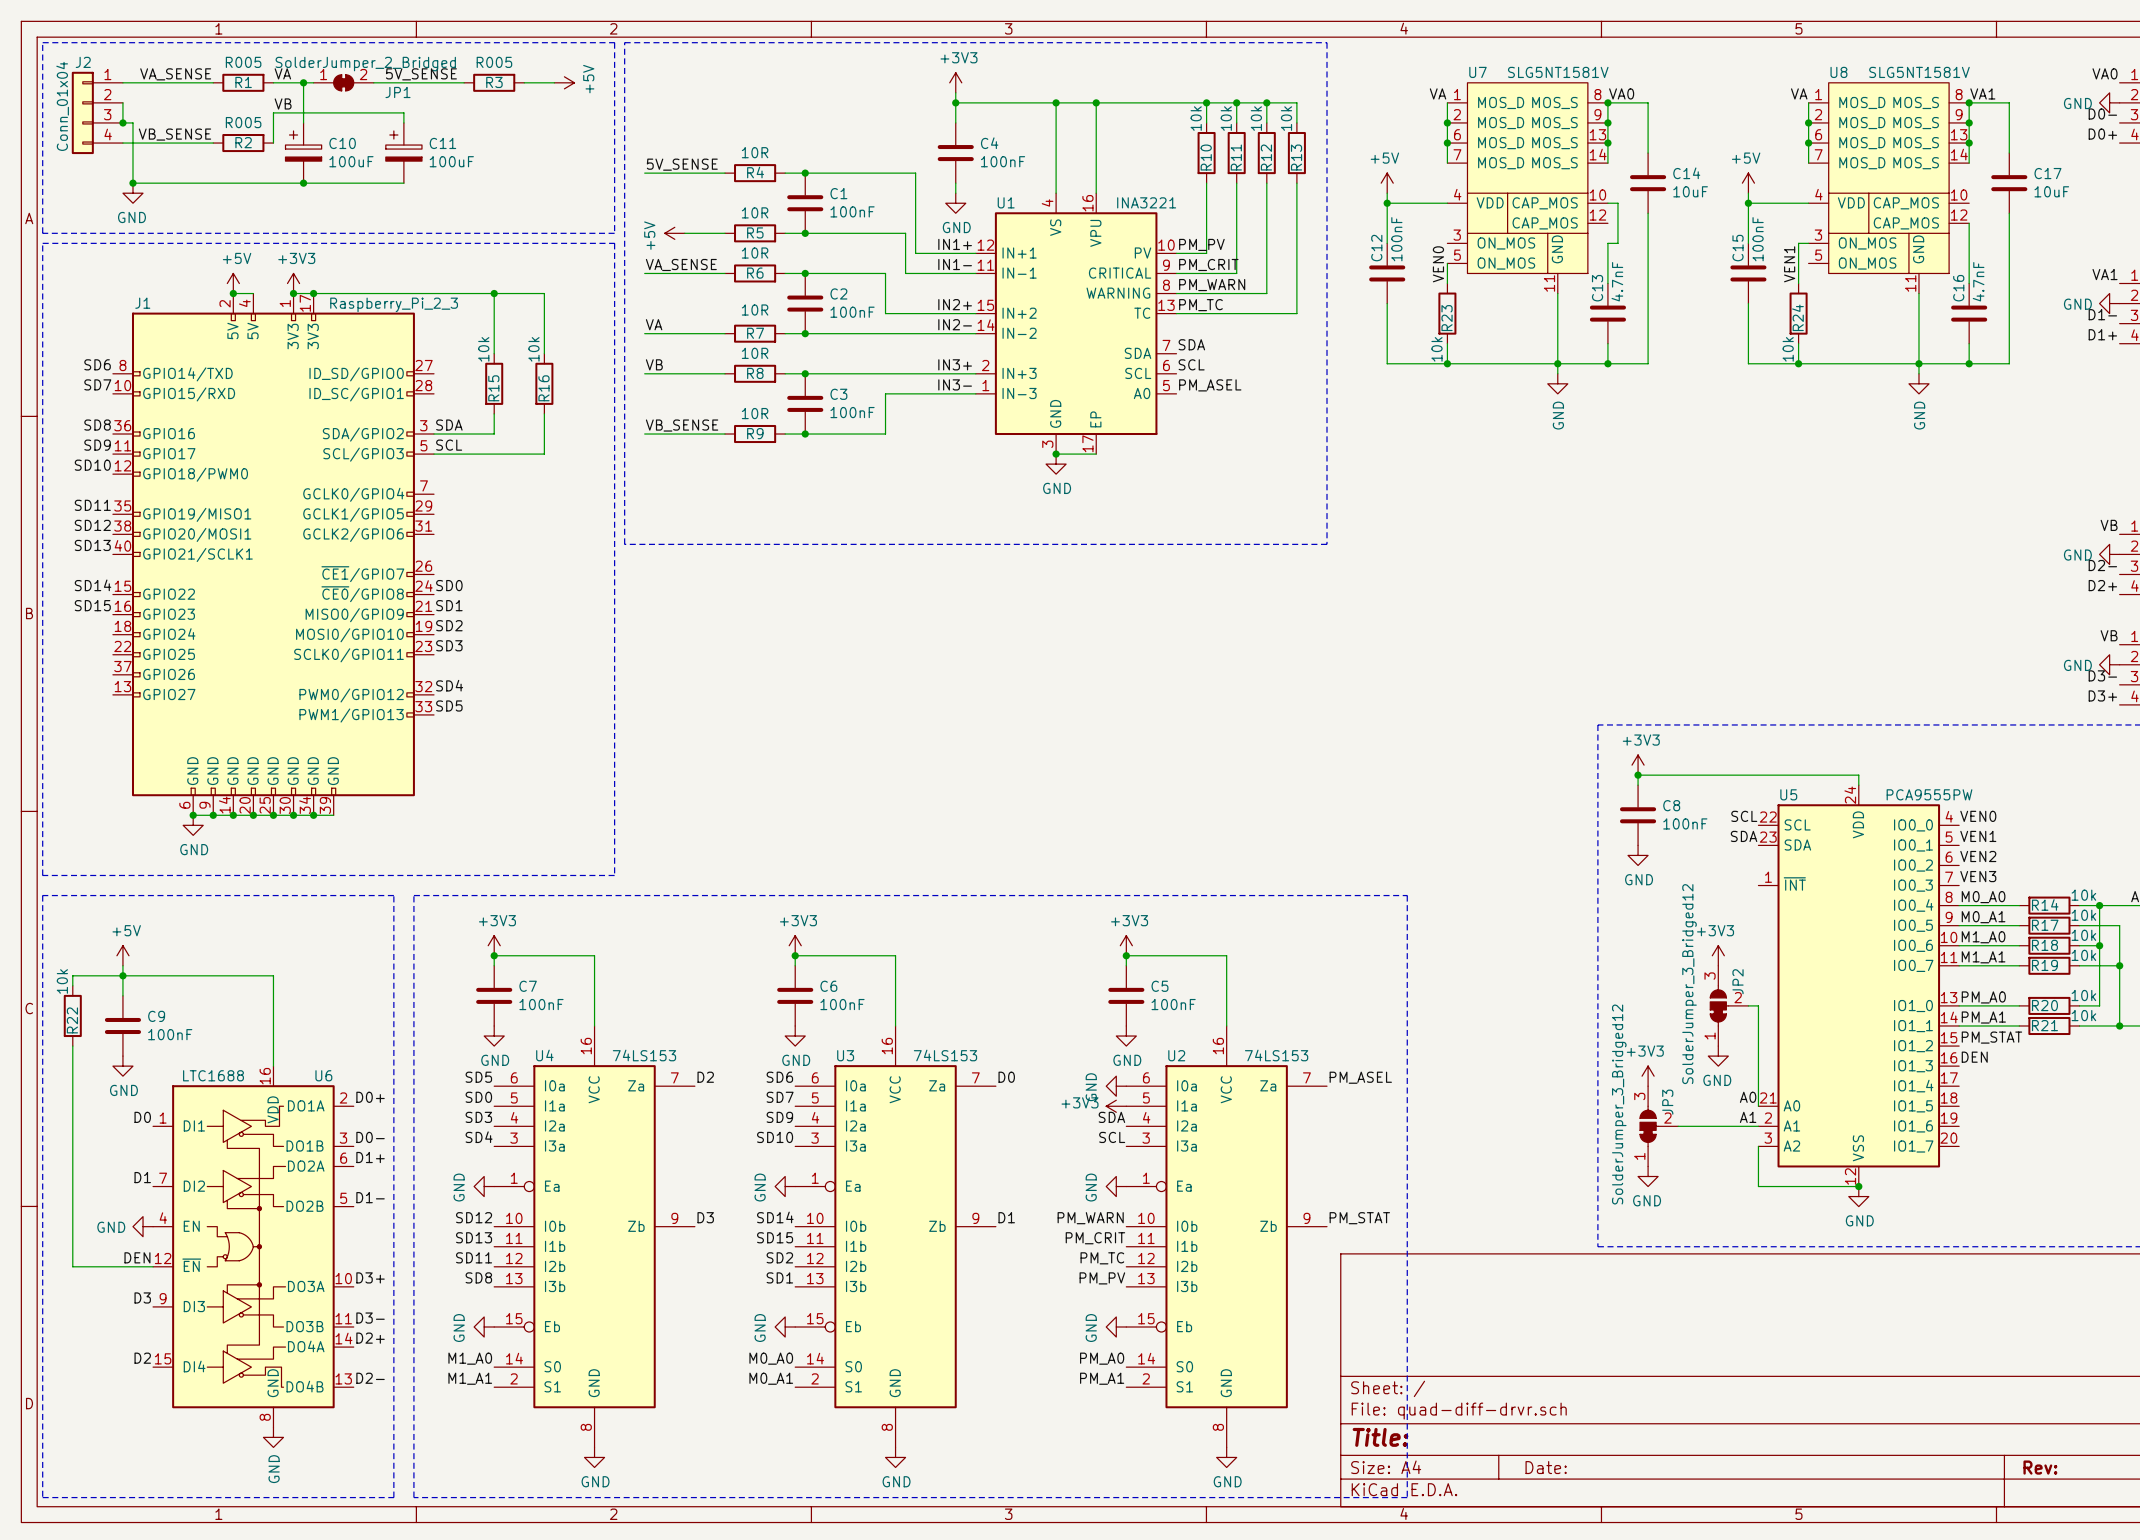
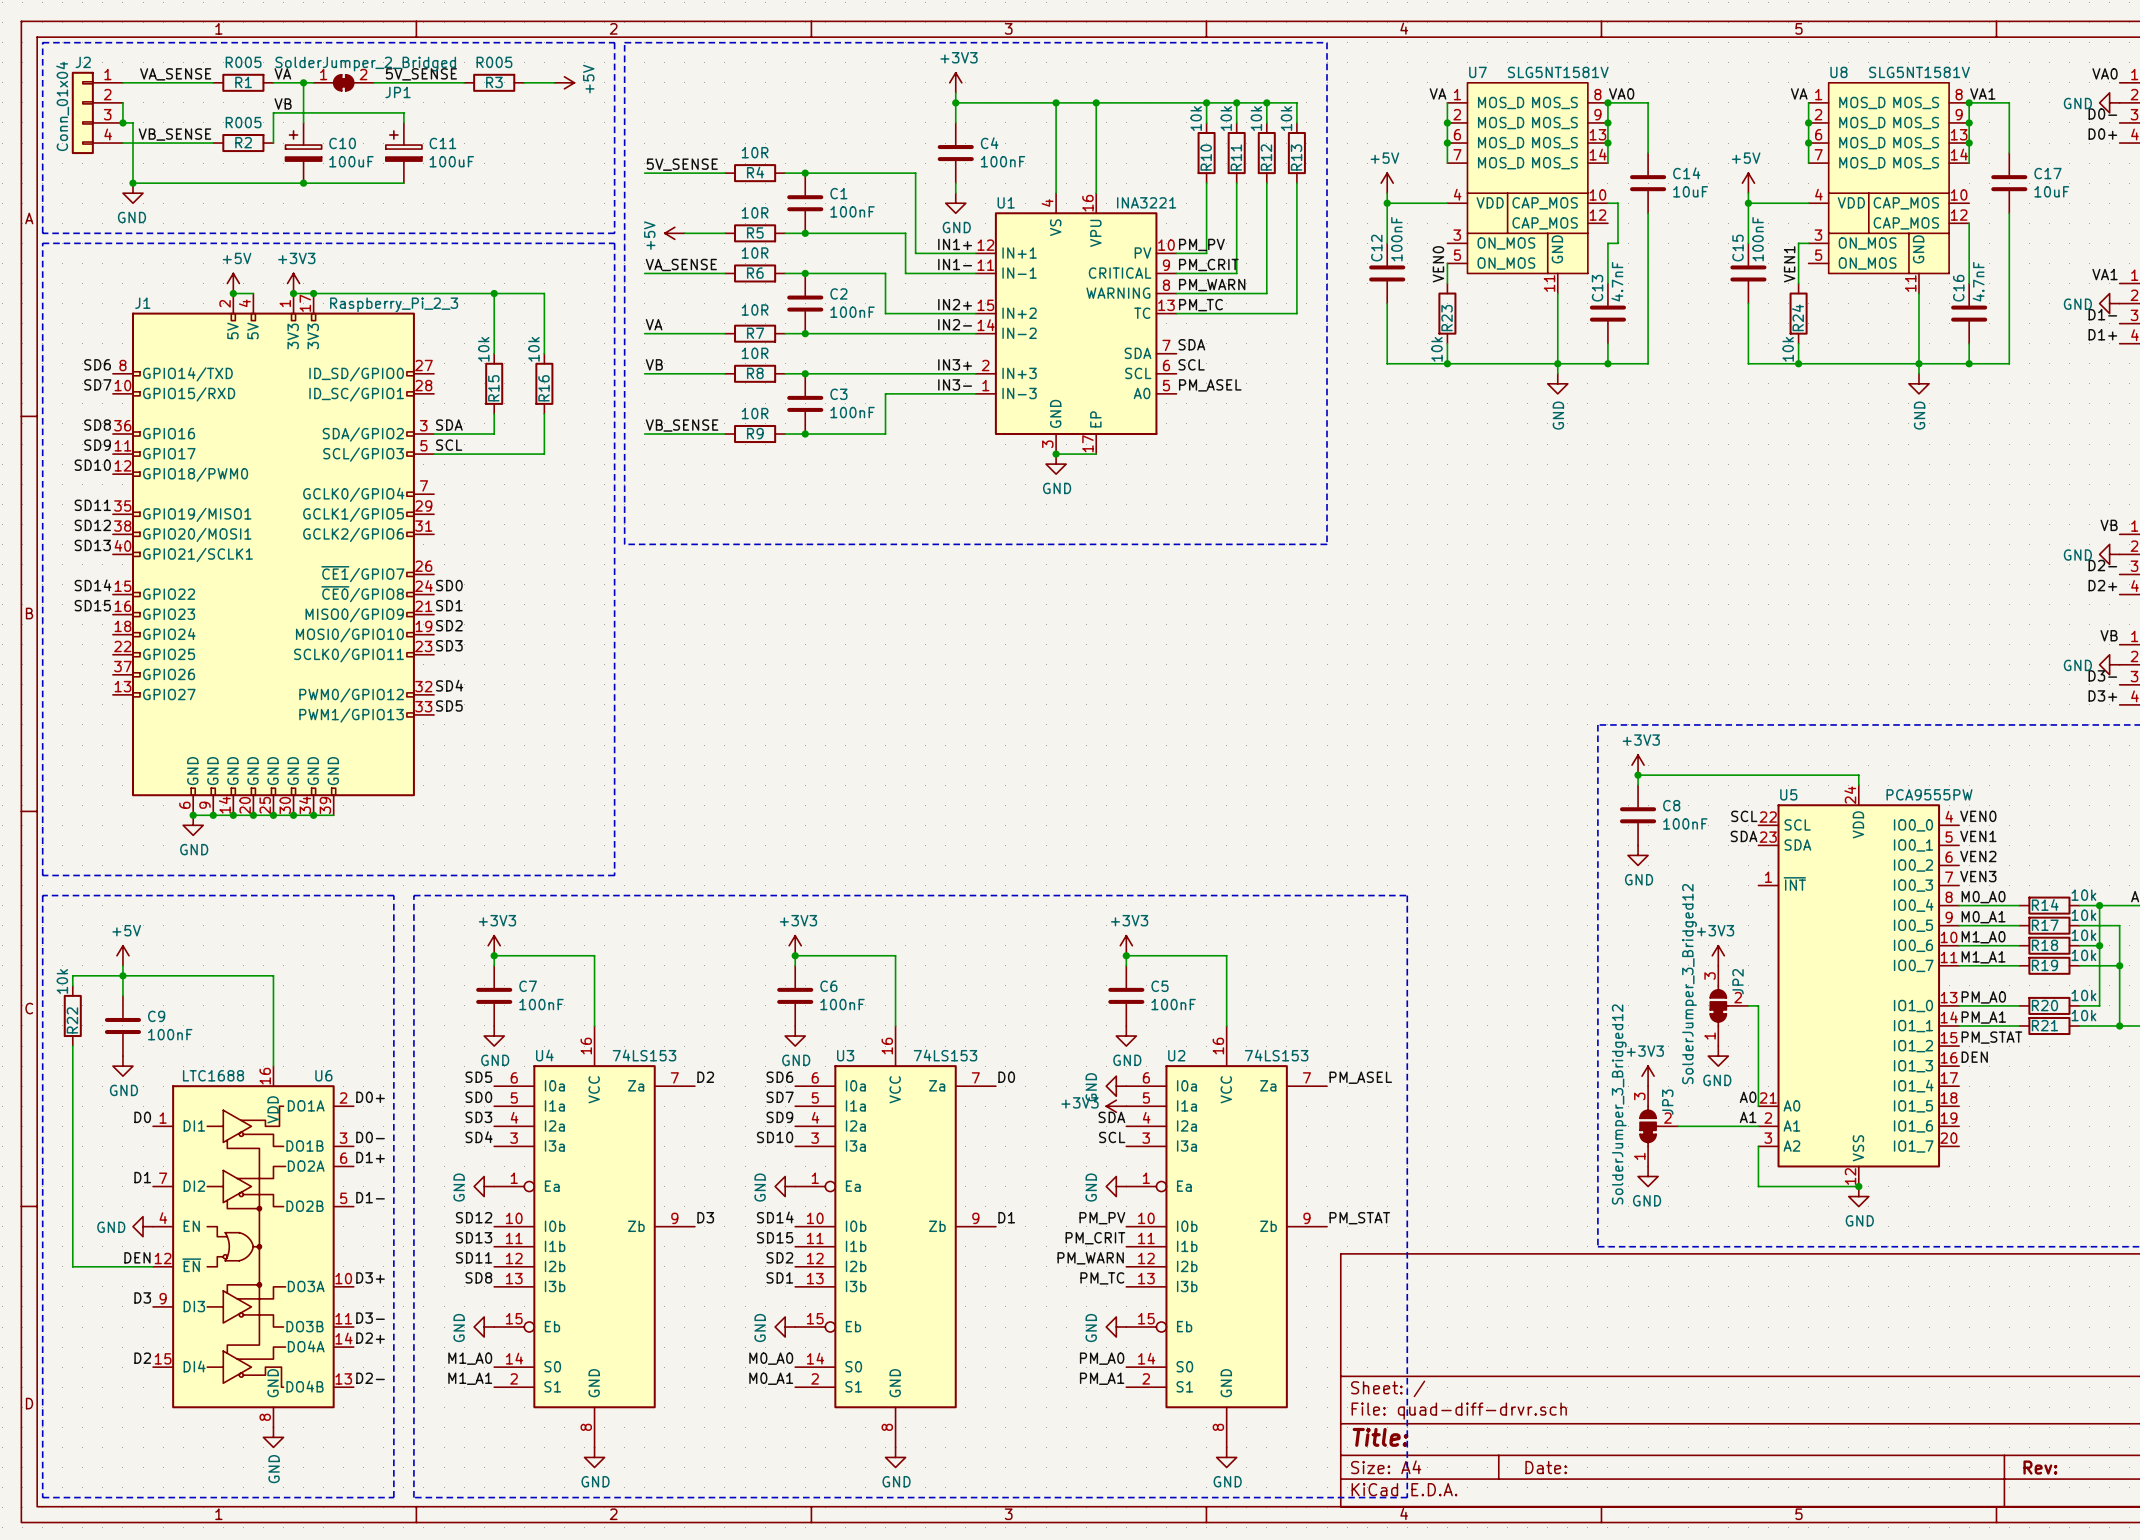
label: PM_WARN (1090, 1218) -> PM_PV (1102, 1218)
label: PM_TC (1102, 1258) -> PM_WARN (1090, 1258)
label: PM_PV (1102, 1278) -> PM_TC (1102, 1278)

